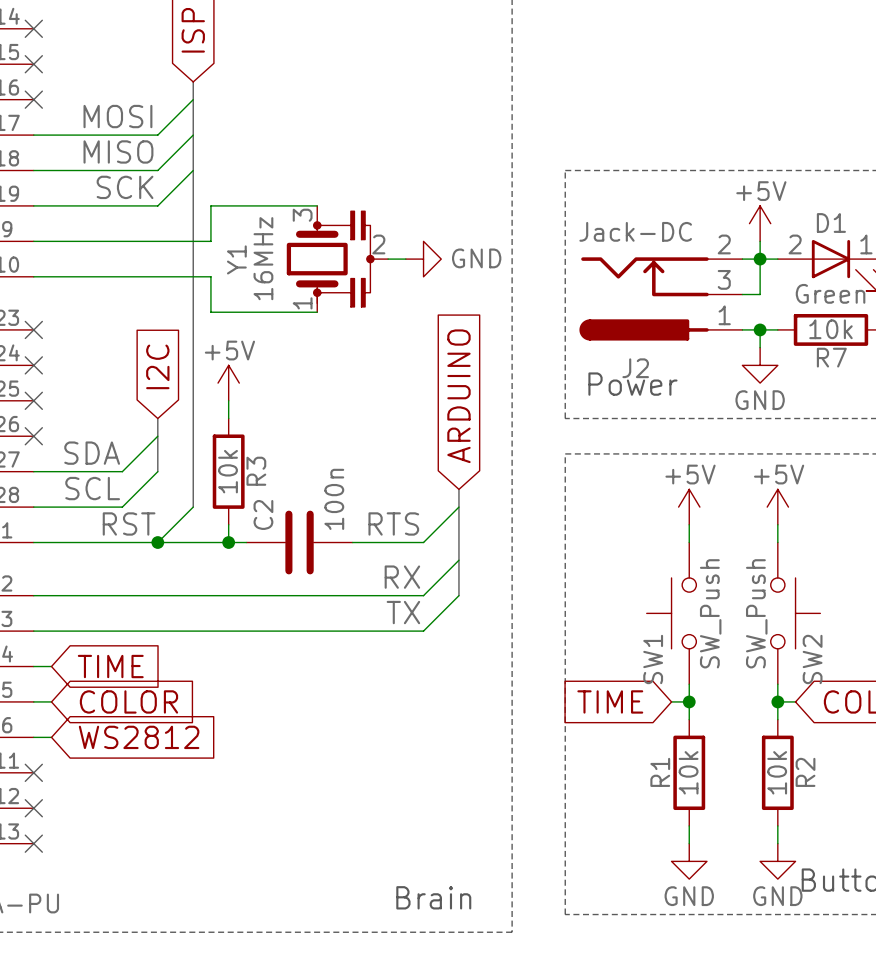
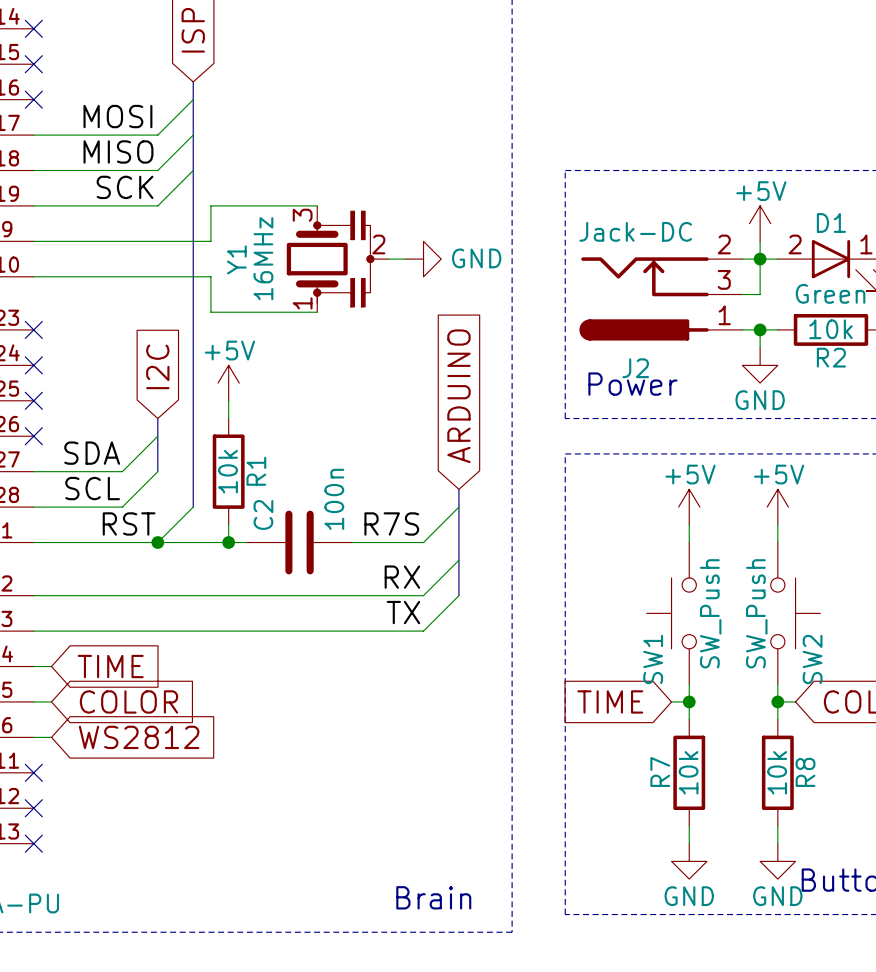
R7 name: R7 (831, 357) -> R2 (831, 357)
R3 name: R3 (256, 471) -> R1 (256, 471)
label: RTS (393, 523) -> R7S (391, 523)
R1 name: R1 (660, 772) -> R7 (660, 771)
R2 name: R2 (805, 772) -> R8 (805, 772)

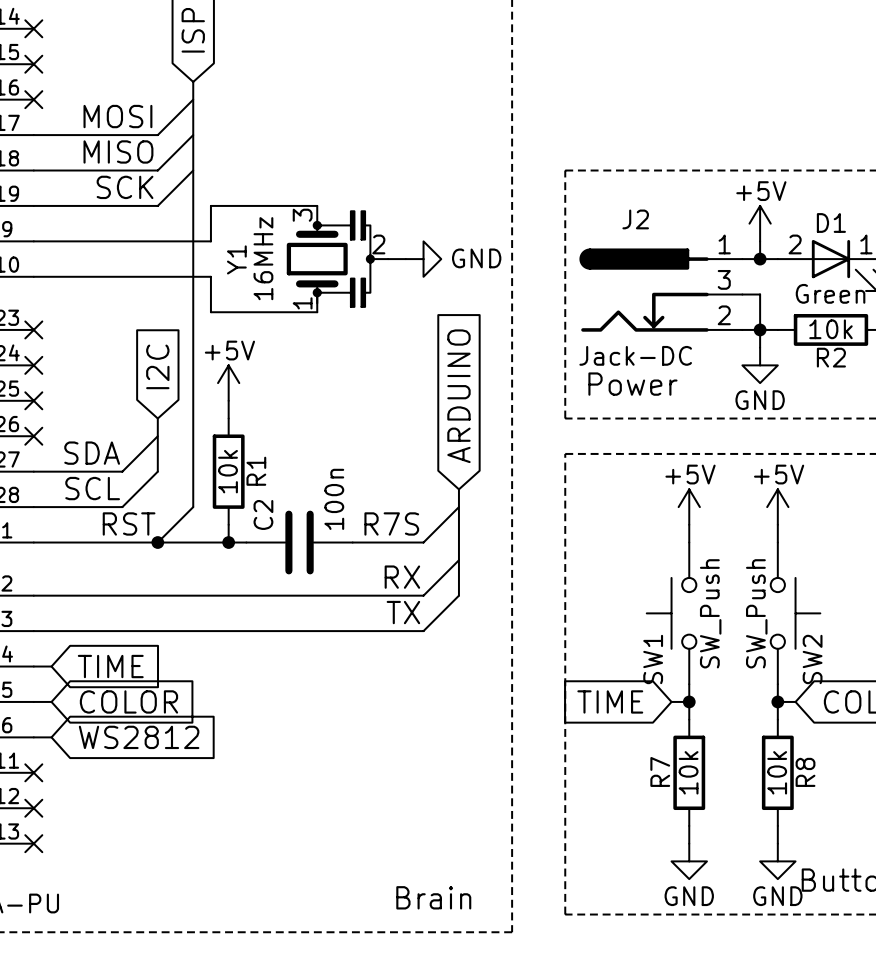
wire: (760, 259) (760, 294) -> (760, 329) (760, 294)
J2 flip: as is (644, 298) -> up-down (644, 290)

